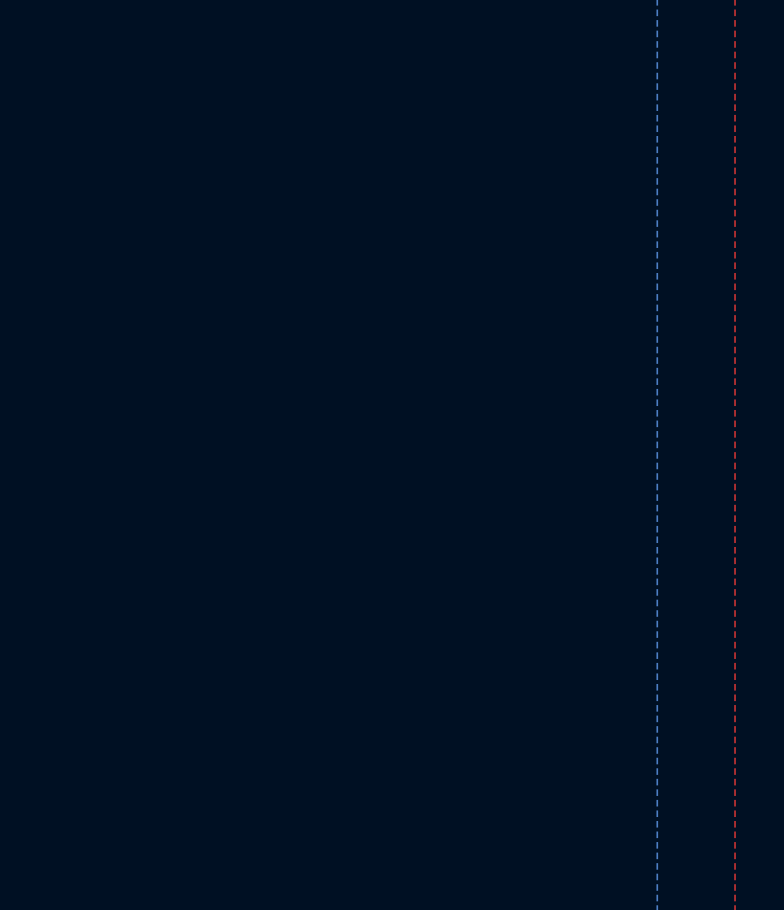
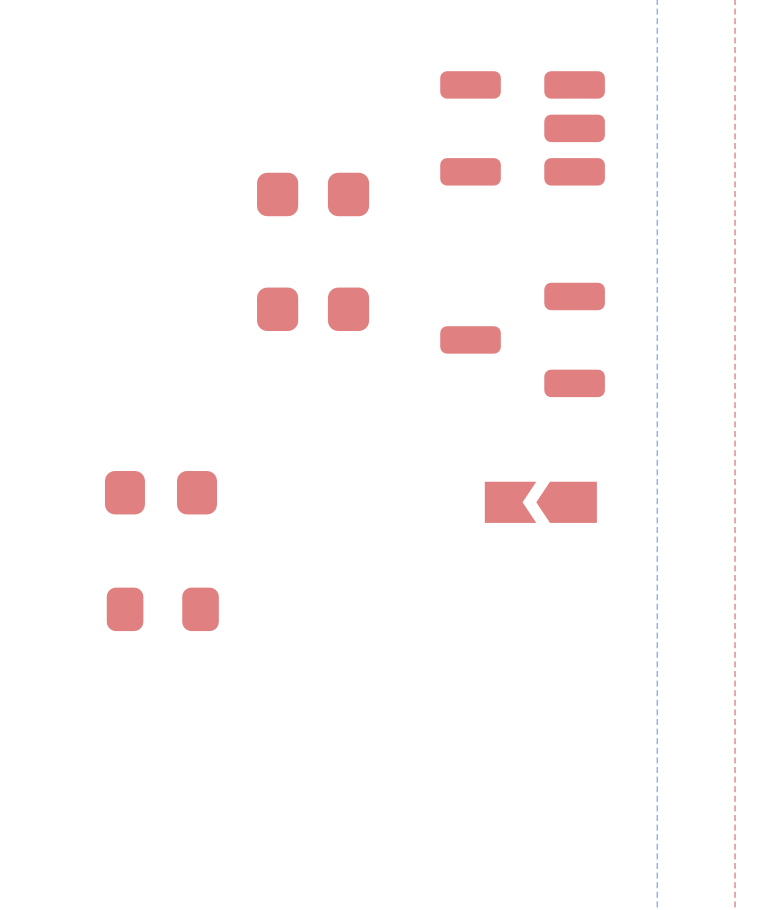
part: none -> (522, 128)
part: none -> (313, 194)
part: none -> (313, 309)
part: none -> (522, 339)
part: none -> (160, 492)
part: none -> (540, 502)
part: none -> (162, 609)

